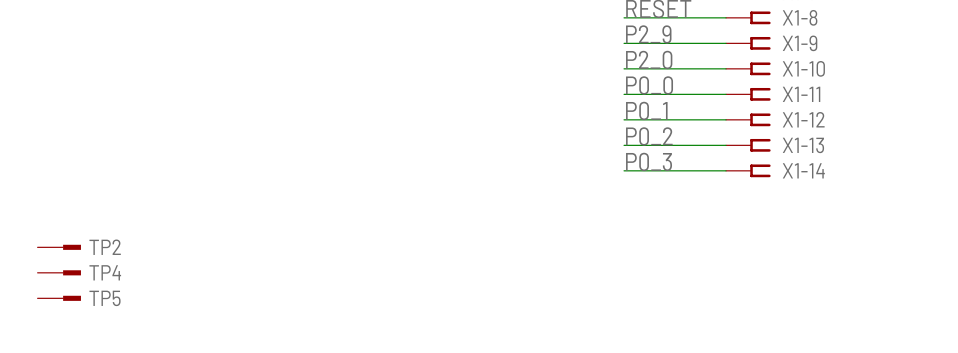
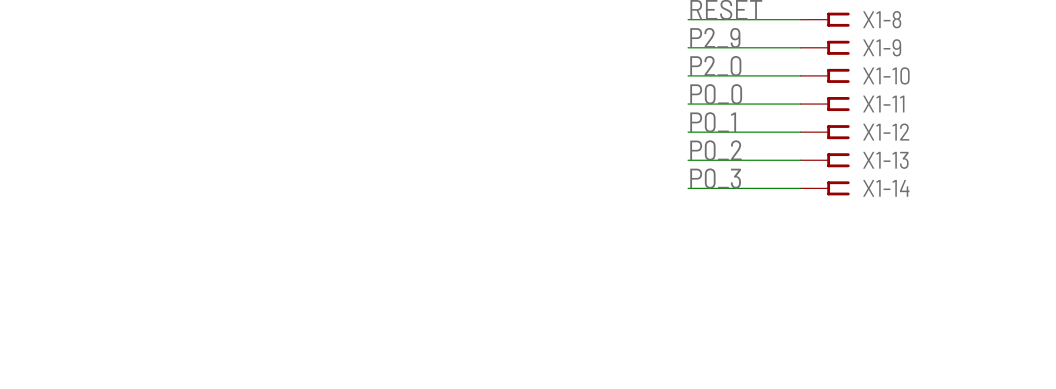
TP2: (59, 247) -> none
TP4: (59, 272) -> none
TP5: (59, 298) -> none

